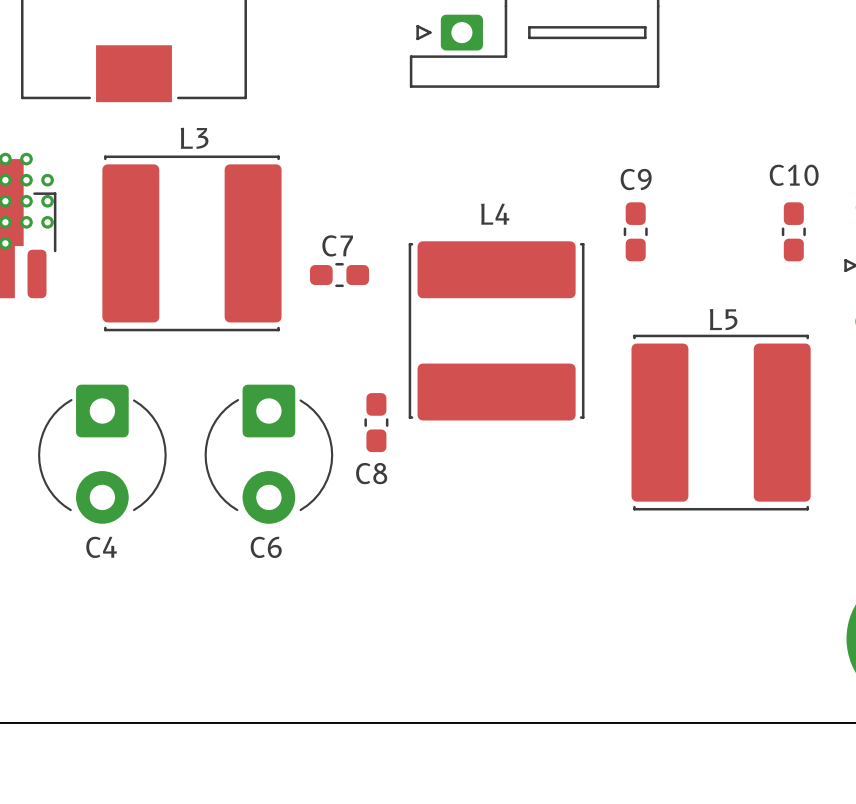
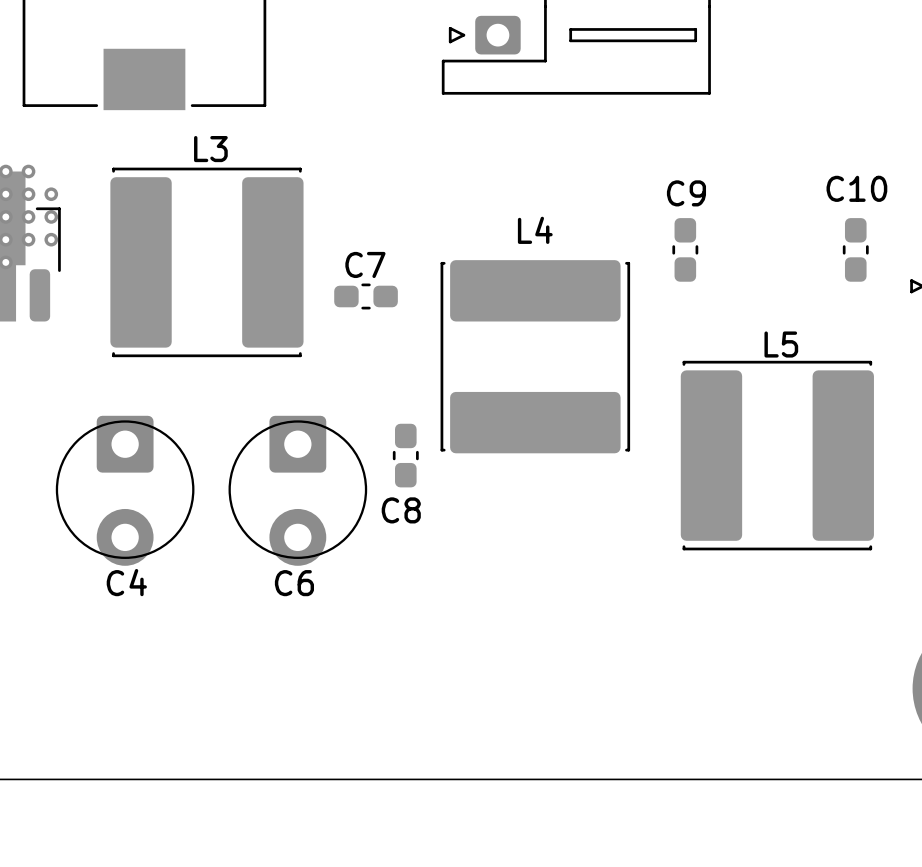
C4 footprint: [38, 384, 167, 524] -> [55, 415, 195, 566]
C6 footprint: [204, 384, 334, 524] -> [228, 415, 368, 566]

